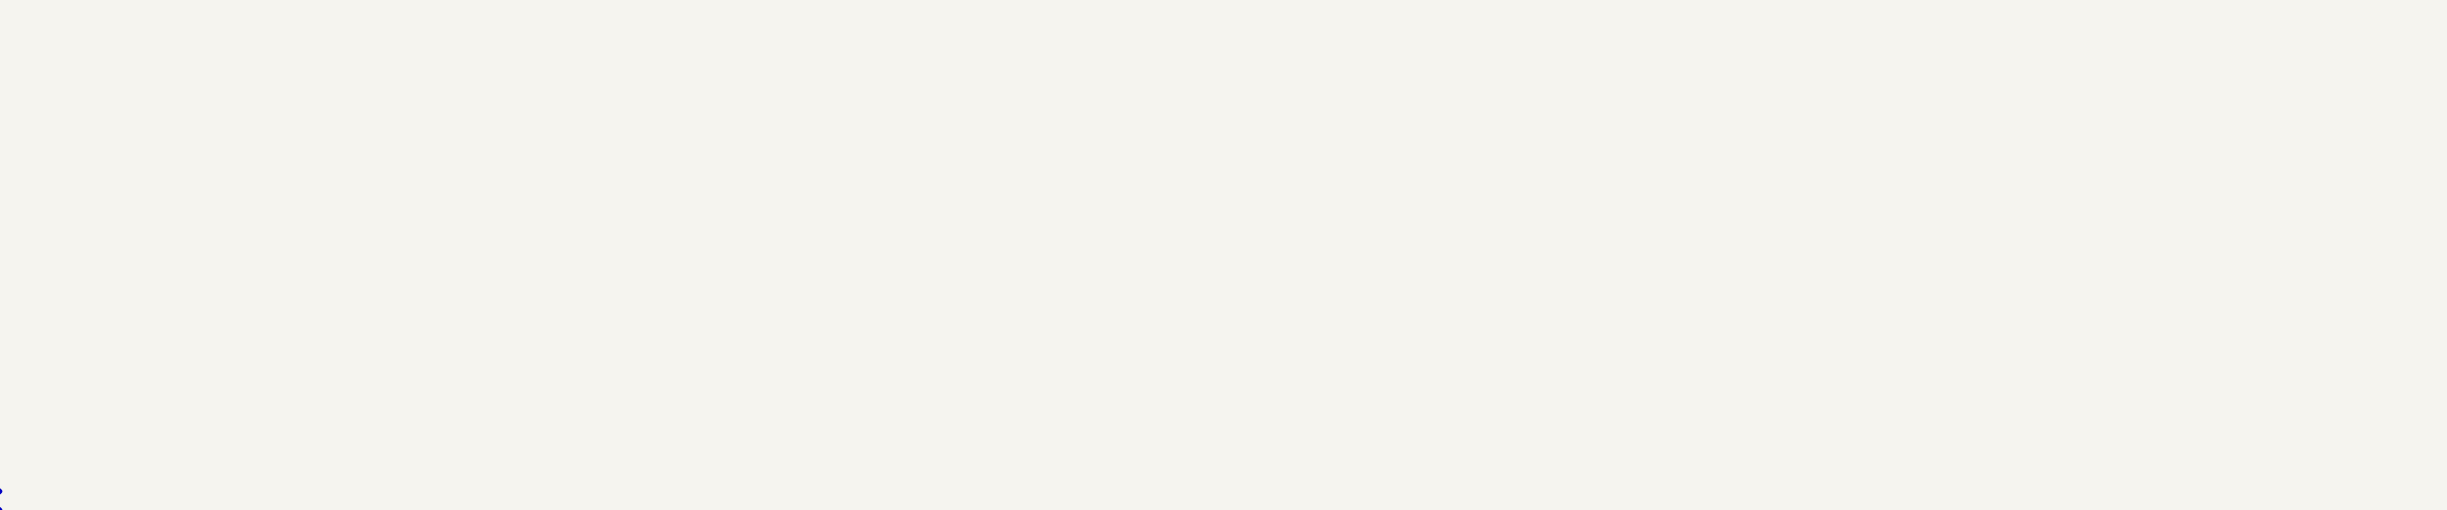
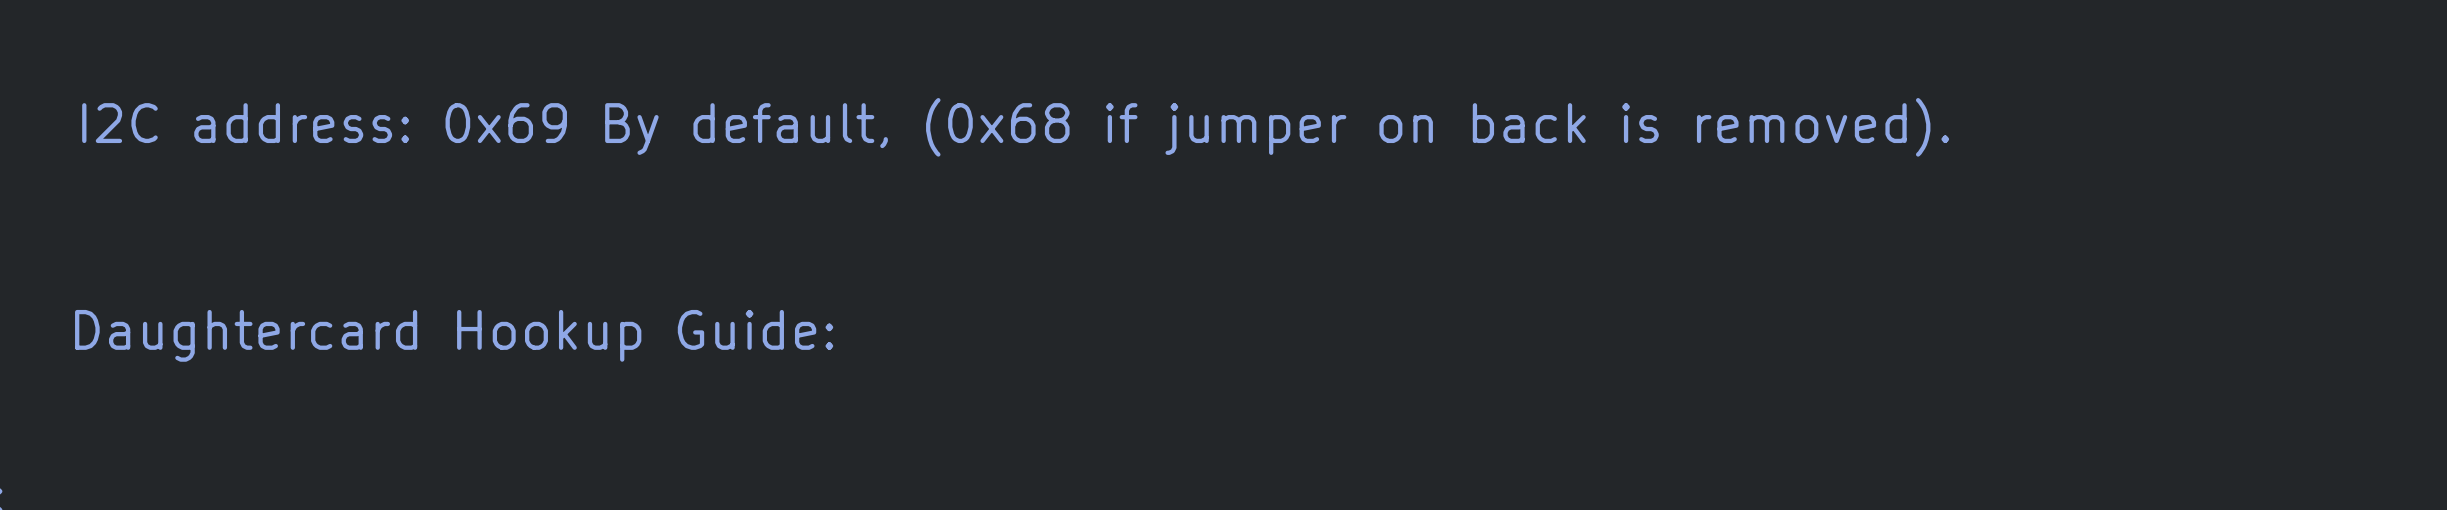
text: none -> I2C address: 0x69 By default, (0x68 if jumper on back is removed). (1015, 127)
text: none -> Daughtercard Hookup Guide: (454, 335)

